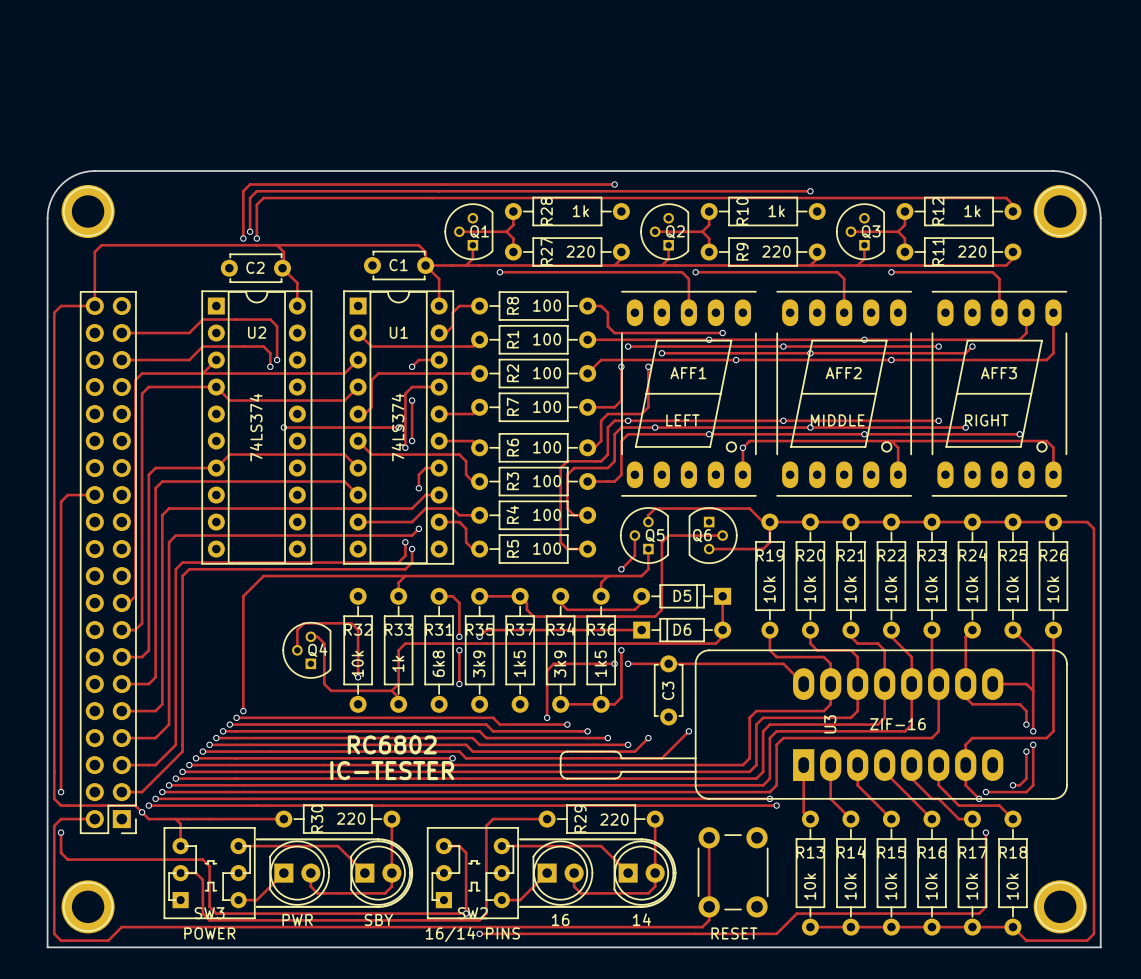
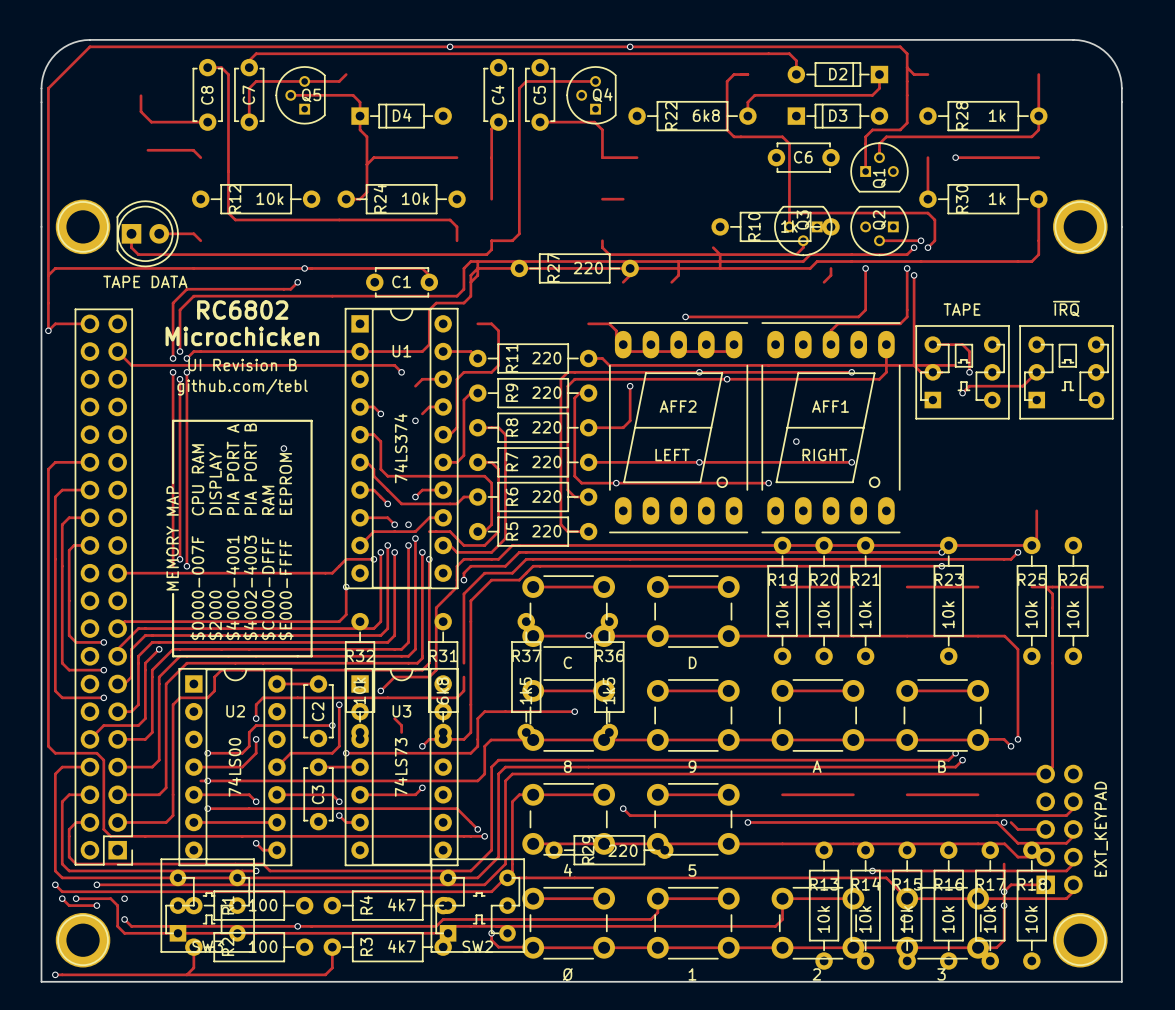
via: none -> (450, 46)
via: none -> (630, 46)
track: none -> (207, 67) (221, 67) (228, 74) (228, 213) (235, 219) (450, 219) (457, 226) (457, 240)
track: none -> (249, 67) (249, 60) (256, 53) (789, 53) (796, 60) (796, 74)
track: none -> (907, 67) (914, 74) (927, 74)
track: none -> (346, 74) (339, 81) (256, 81) (249, 88) (249, 122)
track: none -> (747, 74) (734, 74) (727, 81) (727, 129) (734, 136) (782, 136) (789, 143) (789, 226)
D2: none -> (837, 74)
track: none -> (879, 74) (879, 88) (872, 95) (754, 95) (747, 102) (747, 116)
track: none -> (1038, 74) (1038, 129) (1031, 136) (886, 136) (879, 143) (879, 157)
track: none -> (595, 81) (526, 81) (519, 88) (519, 226)
C8: none -> (207, 94)
C7: none -> (249, 94)
C4: none -> (498, 94)
C5: none -> (540, 94)
track: none -> (141, 95) (141, 111) (151, 122) (207, 122)
D4: none -> (401, 116)
D3: none -> (837, 116)
track: none -> (498, 122) (491, 129) (491, 199)
track: none -> (540, 122) (594, 122) (602, 129) (602, 157) (637, 157)
track: none -> (147, 150) (193, 150) (200, 157)
track: none -> (457, 157) (373, 157) (366, 164)
C6: none -> (803, 157)
track: none -> (927, 157) (927, 199)
track: none -> (955, 157) (1038, 157)
via: none -> (955, 157)
track: none -> (865, 171) (865, 136) (872, 129) (900, 129) (907, 123) (907, 53) (900, 46) (89, 46) (48, 88) (48, 330)
track: (344, 184) (250, 184) (243, 191) (243, 238) -> none
track: (358, 184) (594, 184) -> (360, 199) (366, 192) (366, 136) (360, 129) (360, 102) (353, 95) (290, 95)
via: (614, 184) -> none
track: none -> (1038, 199) (1038, 254) (1031, 261) (817, 261) (810, 268) (477, 268) (470, 275) (470, 296) (463, 303) (436, 303) (429, 310) (429, 344) (422, 351) (193, 351) (186, 358)
track: (810, 191) (256, 191) (250, 198) (250, 231) -> none
via: (810, 191) -> none
track: (776, 198) (263, 198) (256, 204) (256, 238) -> none
track: (911, 198) (1006, 198) (1012, 204) (1012, 211) -> (927, 213) (934, 219) (934, 240) (927, 247)
R28 position: (567, 211) -> (983, 116)
track: (709, 211) (709, 225) (702, 231) (655, 231) -> none
track: (904, 211) (904, 225) (898, 231) -> none
R12 position: (958, 211) -> (256, 199)
R12 value: 1k (972, 211) -> 10k (270, 198)
board edge: (47, 218) (52, 197) (61, 184) (74, 175) (94, 171) (1053, 171) (1069, 173) (1086, 184) (1096, 197) (1100, 218) -> (41, 233) (42, 77) (48, 62) (59, 50) (73, 42) (89, 39) (1084, 41) (1094, 44) (1107, 54) (1114, 62) (1120, 77) (1121, 233)
part: none -> (147, 233)
track: none -> (159, 233) (193, 233) (200, 240)
track: (513, 218) (513, 225) (506, 231) -> (519, 233) (512, 240) (491, 240) (491, 249) (486, 254) (138, 254) (131, 247) (131, 233)
track: none -> (602, 240) (602, 247) (609, 254) (796, 254) (803, 247) (803, 240)
track: none -> (879, 240) (921, 240)
via: none -> (921, 240)
via: (250, 231) -> none
track: (459, 231) (506, 231) -> none
Q1 rotation: 0° (468, 231) -> 90° clockwise (879, 167)
Q1 position: (468, 231) -> (879, 167)
track: (506, 231) (513, 238) (513, 252) -> none
Q2 rotation: 0° (664, 231) -> 90° counterclockwise (879, 230)
Q2 position: (664, 231) -> (879, 230)
track: (850, 231) (898, 231) -> (180, 351) (180, 310) (193, 296) (457, 296) (463, 289) (463, 268) (470, 261) (803, 261) (810, 254) (907, 254) (914, 247)
Q3 rotation: 0° (860, 231) -> 90° counterclockwise (803, 230)
Q3 position: (860, 231) -> (803, 230)
track: (898, 231) (904, 238) (904, 252) -> none
via: none -> (914, 247)
via: none -> (927, 247)
via: (243, 238) -> none
via: (256, 238) -> none
track: (277, 245) (283, 252) (282, 268) (297, 283) (297, 306) -> none
track: (864, 245) (864, 258) (857, 265) -> none
via: none -> (304, 268)
R9 position: (763, 252) -> (533, 393)
track: none -> (865, 268) (865, 310) (858, 316) (685, 316)
via: none -> (865, 268)
track: none -> (907, 268) (907, 316) (900, 323) (837, 323) (830, 330) (830, 344)
via: none -> (907, 268)
R11 position: (958, 252) -> (533, 358)
track: (1012, 252) (1012, 258) (1006, 265) (425, 265) (439, 279) (439, 306) -> none
track: (425, 258) (425, 252) (418, 245) (101, 245) (94, 252) (94, 306) -> (429, 275) (422, 268) (55, 268) (48, 275)
via: none -> (914, 275)
text: none -> TAPE DATA (145, 281)
track: none -> (297, 282) (290, 289) (186, 289) (173, 303) (173, 358)
via: none -> (297, 282)
C2 rotation: 0° (255, 268) -> 90° clockwise (318, 711)
C2 position: (255, 268) -> (318, 711)
track: (499, 272) (682, 272) (688, 279) (688, 312) -> none
via: (499, 272) -> none
track: (695, 272) (837, 272) (844, 279) (844, 312) -> none
via: (695, 272) -> none
track: (891, 272) (992, 272) (999, 279) (999, 312) -> none
via: (891, 272) -> none
U2 footprint: [201, 290, 313, 565] -> [178, 668, 293, 867]
text: none -> RC6802 (242, 310)
via: none -> (685, 316)
R8 value: 100 (547, 305) -> 220 (546, 427)
track: (472, 306) (459, 306) (452, 312) (452, 326) (445, 333) -> (477, 358) (470, 351) (450, 351)
R8 position: (533, 306) -> (533, 427)
track: none -> (588, 323) (595, 323)
track: (54, 312) (54, 447) -> (89, 462) (55, 462) (48, 469)
via: none -> (48, 330)
track: (1026, 312) (1026, 333) (1019, 339) (594, 339) -> (637, 365) (609, 365) (602, 358)
track: (1053, 312) (1053, 353) (1046, 360) (864, 360) -> (886, 344) (886, 372) (879, 379)
text: none -> Microchicken (242, 336)
track: none -> (932, 344) (962, 344) (969, 351) (969, 372)
U2 name position: U2 (257, 332) -> U2 (235, 711)
track: (121, 333) (189, 333) (202, 319) (270, 319) (277, 326) (277, 360) -> none
via: none -> (180, 351)
track: (358, 333) (371, 346) -> (263, 365) (373, 365)
via: (722, 333) -> none
via: none -> (173, 358)
via: none -> (186, 358)
track: (479, 339) (472, 346) (391, 346) -> (401, 372) (394, 365)
R1 position: (533, 339) -> (249, 905)
via: (709, 339) -> none
via: (864, 339) -> none
track: (202, 346) (189, 360) (121, 360) -> (200, 365) (131, 365) (117, 351)
text: none -> UI Revision B (242, 365)
track: (263, 346) (270, 353) (270, 366) -> none
via: (628, 346) -> none
via: (783, 346) -> none
via: (938, 346) -> none
track: (972, 346) (965, 353) (925, 353) -> none
via: (972, 346) -> none
track: none -> (173, 372) (173, 566)
via: none -> (173, 372)
track: none -> (186, 372) (186, 566)
via: none -> (186, 372)
track: none -> (671, 372) (567, 372) (560, 379) (560, 524) (567, 531) (588, 531)
via: (661, 353) -> none
via: none -> (699, 372)
via: (810, 353) -> none
track: (837, 353) (904, 353) -> (914, 275) (914, 365) (921, 372)
via: none -> (851, 372)
part: none -> TAPE (962, 372)
via: none -> (969, 372)
track: none -> (1036, 372) (1022, 386) (969, 386) (962, 393)
part: none -> ~{IRQ} (1066, 372)
track: none -> (180, 379) (180, 559)
via: none -> (180, 379)
track: (216, 360) (202, 373) -> none
via: (277, 360) -> none
track: (358, 360) (344, 373) (142, 373) (135, 380) (135, 596) (128, 603) (121, 603) -> (346, 587) (346, 614) (339, 621) (124, 621) (117, 628)
track: (601, 360) (587, 373) -> (609, 379) (574, 379) (567, 386) (567, 490) (574, 496) (588, 496)
via: none -> (727, 379)
via: (736, 360) -> none
via: (891, 360) -> none
via: (270, 366) -> none
via position: (412, 366) -> (401, 372)
track: (648, 366) (648, 407) (641, 414) (607, 414) (601, 420) (601, 441) (594, 447) (587, 447) -> none
via: (648, 366) -> none
text: none -> github.com/tebl (242, 387)
track: (466, 373) (378, 373) (371, 380) (371, 407) (364, 414) -> none
R2 position: (533, 373) -> (249, 947)
via: none -> (962, 393)
track: (358, 387) (344, 400) (229, 400) (216, 387) (148, 387) (142, 393) (142, 623) (135, 630) (121, 630) -> (380, 552) (380, 621) (373, 628) (138, 628) (117, 649) (117, 656)
track: (425, 387) (412, 387) (405, 393) (405, 447) -> (429, 406) (422, 413)
via: none -> (380, 413)
AFF1 position: (688, 393) -> (830, 427)
AFF2 position: (844, 393) -> (678, 427)
AFF3: RIGHT (999, 393) -> none
track: (412, 400) (412, 441) -> none
R7 value: 100 (547, 406) -> 220 (546, 461)
track: (479, 407) (472, 414) (445, 414) -> (484, 323) (491, 323) (498, 330) (498, 365) (491, 372) (463, 372) (457, 379) (457, 427) (450, 434)
R7 position: (533, 407) -> (533, 462)
via: (628, 420) -> none
AFF1 value: LEFT (682, 420) -> RIGHT (824, 455)
AFF2 value: MIDDLE (837, 420) -> LEFT (672, 455)
track: (938, 420) (614, 420) (607, 427) (607, 454) (601, 461) -> (768, 483) (609, 483)
via: (938, 420) -> none
U2 value: 74LS374 (256, 427) -> 74LS00 (234, 767)
track: (283, 427) (398, 427) -> none
via: (398, 427) -> none
via: (655, 427) -> none
via: (810, 427) -> none
track: (965, 427) (621, 427) (614, 434) (614, 461) (607, 468) (574, 468) (567, 474) (567, 508) (574, 515) (587, 515) -> none
via: (965, 427) -> none
via: (709, 434) -> none
via: (864, 434) -> none
track: (1019, 434) (628, 434) (621, 441) (621, 474) (614, 481) (587, 481) -> none
via: (1019, 434) -> none
track: (358, 441) (371, 454) (385, 454) -> (366, 434) (373, 434) (380, 441) (380, 469) (387, 476)
track: none -> (360, 462) (366, 462) (373, 469) (373, 476) (401, 503) (457, 503) (463, 496) (477, 496)
via: (412, 441) -> none
track: (452, 441) (472, 441) (479, 447) -> (457, 462) (463, 455) (463, 400) (470, 393)
via: none -> (699, 462)
track: (749, 441) (742, 447) (742, 474) -> (761, 462) (588, 462)
track: (837, 441) (1046, 441) (1053, 447) (1053, 474) -> none
via: none -> (851, 462)
track: (891, 441) (898, 447) (898, 474) -> none
text: none -> PIA PORT A (233, 469)
text: none -> PIA PORT B (250, 469)
via: (405, 447) -> none
R6 position: (533, 447) -> (533, 496)
R6 value: 100 (547, 447) -> 220 (546, 496)
via position: (742, 447) -> (768, 483)
track: (459, 454) (466, 461) (466, 474) (472, 481) (479, 481) -> (463, 476) (484, 476) (491, 483) (491, 524) (484, 531) (477, 531)
text: none -> CPU RAM (198, 479)
line: none -> (173, 483) (173, 420) (311, 420) (311, 656) (173, 656) (173, 593)
text: none -> DISPLAY (215, 483)
track: (574, 461) (567, 461) (560, 468) (560, 542) (567, 549) (587, 549) -> (581, 483) (574, 476) (574, 398) (579, 393) (588, 393)
via: none -> (616, 483)
text: none -> EEPROM (285, 483)
track: (358, 468) (344, 454) (229, 454) (216, 468) (155, 468) (148, 474) (148, 636) -> (159, 649) (145, 663)
track: none -> (360, 490) (373, 490) (387, 503)
track: (425, 468) (418, 474) (418, 488) -> (429, 490) (422, 490) (415, 496)
via: none -> (415, 496)
text: none -> RAM (268, 500)
via: none -> (387, 503)
R3 position: (533, 481) -> (387, 947)
R3 value: 100 (547, 481) -> 4k7 (401, 946)
via: (418, 488) -> none
track: (74, 495) (67, 495) (61, 501) -> (89, 490) (62, 490) (55, 496) (55, 524)
track: none -> (69, 517) (62, 524) (62, 663) (69, 670) (103, 670)
track: (358, 495) (344, 481) (162, 481) (155, 488) (155, 643) -> (304, 649) (173, 649) (152, 670)
track: none -> (360, 517) (387, 517) (394, 524)
via: none -> (394, 524)
via: none -> (408, 524)
track: (371, 508) (169, 508) (162, 515) (162, 650) -> (415, 587) (415, 649) (408, 656) (180, 656) (159, 677)
track: (425, 508) (412, 522) (358, 522) -> (373, 531) (360, 545)
track: (445, 508) (452, 508) (459, 515) (479, 515) -> (450, 531) (463, 545) (484, 545) (498, 531) (498, 469) (491, 462) (477, 462)
R4 value: 100 (547, 514) -> 4k7 (401, 904)
text: none -> MEMORY MAP (172, 538)
track: none -> (415, 538) (415, 573)
via: none -> (415, 538)
R4 position: (533, 515) -> (387, 905)
track: none -> (89, 545) (74, 545) (69, 550) (69, 635) (76, 642) (103, 642)
track: none -> (387, 545) (387, 628) (380, 635) (145, 635) (131, 649) (131, 677) (124, 683)
via: none -> (387, 545)
track: none -> (408, 545) (408, 566)
via: none -> (408, 545)
track: (445, 522) (459, 522) (466, 528) (466, 542) (472, 549) (479, 549) -> (450, 545) (457, 552) (491, 552) (505, 538) (505, 434) (498, 427) (477, 427)
track: (648, 522) (648, 515) (655, 508) (749, 508) (763, 522) -> (380, 690) (394, 677) (429, 677) (436, 670) (436, 607) (457, 587) (457, 566) (463, 559) (498, 559) (512, 545) (775, 545)
track: (769, 522) (769, 542) (763, 549) (709, 549) -> none
track: (1012, 522) (1087, 522) (1093, 528) (1093, 933) (1087, 940) (1026, 940) (1012, 927) (810, 927) -> (1031, 545) (1036, 540) (1036, 510)
via: none -> (380, 552)
via: none -> (394, 552)
track: (418, 528) (412, 535) (371, 535) -> (422, 552) (422, 658) (417, 663) (318, 663)
track: none -> (941, 552) (519, 552) (505, 566) (470, 566) (463, 573) (463, 580)
via: none -> (941, 552)
track: none -> (1017, 552) (1011, 559) (734, 559)
via: none -> (1017, 552)
via: none -> (180, 559)
track: (344, 535) (175, 535) (169, 542) (169, 657) -> (311, 663) (186, 663) (166, 683)
track: none -> (346, 559) (332, 573) (117, 573)
via: none -> (373, 559)
via: none -> (429, 559)
track: (634, 535) (634, 555) (621, 569) -> none
Q5 position: (644, 535) -> (300, 95)
track: (668, 535) (661, 542) (661, 609) (655, 616) (533, 616) (526, 609) (526, 603) (520, 596) (479, 596) -> (678, 559) (526, 559) (512, 573) (484, 573) (463, 593) (463, 628)
Q6: (713, 535) -> none
via: none -> (186, 566)
via: (405, 542) -> none
track: none -> (941, 566) (533, 566) (519, 580) (491, 580) (470, 600) (470, 732) (463, 739) (429, 739) (422, 746)
via: none -> (941, 566)
R5 value: 100 (547, 548) -> 220 (546, 531)
via: (412, 549) -> none
R5 position: (533, 549) -> (533, 531)
track: (648, 549) (648, 569) (641, 576) (263, 576) (243, 596) (243, 711) -> none
track: (405, 555) (398, 562) (182, 562) (175, 569) (175, 677) -> (408, 670) (221, 670) (214, 677) (214, 690) (207, 697) (180, 697) (173, 704)
via: none -> (463, 580)
R22 name position: R22 (891, 555) -> R22 (671, 115)
R24 name position: R24 (972, 555) -> R24 (380, 198)
via: none -> (346, 587)
track: (412, 562) (405, 569) (189, 569) (182, 576) (182, 751) (142, 792) -> (159, 822) (138, 822)
track: none -> (533, 587) (604, 587)
track: none -> (657, 587) (728, 587)
track: none -> (782, 587) (853, 587)
track: none -> (907, 587) (978, 587)
track: none -> (1031, 587) (1102, 587)
text: none -> $0000-007F (198, 588)
text: none -> $4000-4001 (233, 587)
text: none -> $4002-4003 (250, 587)
text: none -> $C000-DFFF (268, 588)
text: none -> $E000-FFFF (285, 589)
via: (621, 569) -> none
track: (405, 576) (398, 582) (398, 596) -> none
track: (607, 576) (601, 582) (601, 596) -> none
R22 rotation: 0° (891, 576) -> 90° clockwise (692, 116)
R22 position: (891, 576) -> (692, 116)
R24 rotation: 0° (972, 576) -> 90° clockwise (401, 199)
R24 position: (972, 576) -> (401, 199)
part: none -> C (568, 611)
part: none -> D (693, 611)
R22 value: 10k (891, 589) -> 6k8 (706, 115)
text: none -> $2000 (215, 615)
track: (439, 596) (452, 596) (459, 603) -> (360, 406) (373, 406) (380, 413)
track: (560, 596) (560, 603) (567, 609) (634, 609) (641, 603) (641, 596) -> none
D5: (682, 596) -> none
track: (722, 596) (722, 636) (715, 643) (418, 643) -> (429, 559) (429, 663) (422, 670)
via: none -> (588, 635)
track: none -> (533, 636) (1004, 636) (1017, 649) (1017, 739)
via: none -> (103, 642)
via: none -> (159, 649)
track: (304, 623) (297, 630) (297, 650) -> none
track: (351, 623) (358, 630) (358, 677) -> (353, 649) (401, 649) (408, 642) (408, 580)
track: (641, 630) (486, 630) (479, 636) -> none
D6: (682, 630) -> none
track: (769, 630) (769, 650) (776, 657) (823, 657) (830, 663) (830, 704) (823, 711) (756, 711) (749, 717) (749, 758) (742, 765) (717, 765) -> none
track: (810, 630) (810, 643) (817, 650) (850, 650) (857, 657) (857, 711) (850, 717) (763, 717) (756, 724) (756, 765) (749, 771) (182, 771) -> none
track: (850, 630) (850, 636) (857, 643) (877, 643) (884, 650) (884, 717) (877, 724) (769, 724) (763, 731) (763, 771) (756, 778) (452, 778) -> (477, 829) (457, 808)
track: (891, 630) (891, 636) (911, 657) (911, 724) (904, 731) -> (955, 753) (948, 760) (921, 760)
track: (931, 630) (931, 677) (938, 684) (938, 731) (931, 738) -> (962, 760) (955, 767) (948, 767)
track: (972, 630) (965, 636) (965, 697) (972, 704) (1019, 704) (1026, 711) (1026, 724) -> none
track: (1012, 630) (1033, 650) -> (1045, 587) (1052, 593) (1052, 677)
track: (1053, 630) (1053, 731) (1046, 738) (972, 738) (965, 744) (965, 785) (979, 798) -> none
track: (317, 636) (324, 643) (324, 684) (331, 690) (391, 690) (398, 684) (398, 650) (405, 643) -> none
via: (459, 636) -> none
via: (479, 636) -> none
via: none -> (103, 670)
U3 footprint: [559, 649, 1068, 800] -> [344, 668, 459, 867]
track: (148, 650) (142, 657) (128, 657) -> (145, 677) (145, 718) (138, 725) (103, 725) (89, 739)
Q4 position: (306, 650) -> (591, 95)
R33: 1k (398, 650) -> none
via: (459, 650) -> none
R35: 3k9 (479, 650) -> none
R34: 3k9 (560, 650) -> none
track: (621, 650) (621, 697) (614, 704) (560, 704) -> none
via: (621, 650) -> none
track: none -> (276, 683) (318, 683)
track: (61, 663) (61, 744) -> (89, 767) (62, 767) (55, 774)
track: none -> (55, 690) (62, 697) (103, 697)
via: none -> (380, 690)
track: (459, 663) (459, 684) -> (463, 690) (457, 697) (263, 697) (256, 704) (256, 718)
track: (553, 663) (547, 670) (547, 717) -> (560, 690) (533, 690)
track: (595, 663) (614, 663) -> none
via: (614, 663) -> none
track: (628, 663) (648, 663) -> none
via: (628, 663) -> none
track: (717, 663) (769, 663) -> none
track: (783, 663) (803, 684) -> (796, 690) (853, 690)
track: none -> (907, 690) (978, 690)
via: none -> (103, 697)
track: (155, 677) (148, 684) (135, 684) -> (394, 552) (394, 635) (387, 642) (152, 642) (138, 656) (138, 704) (131, 711)
via: none -> (339, 704)
via: (358, 677) -> none
via: (459, 684) -> none
via: none -> (574, 711)
track: (992, 684) (1026, 684) (1033, 690) -> none
part: none -> 8 (568, 715)
part: none -> 9 (693, 715)
part: none -> A (817, 715)
part: none -> B (942, 715)
via: none -> (256, 718)
C3 position: (668, 690) -> (318, 794)
track: none -> (332, 725) (256, 725) (249, 732) (249, 746) (242, 753)
via: none -> (332, 725)
track: (162, 704) (155, 711) (148, 711) -> (152, 704) (152, 732) (145, 739)
via: (243, 711) -> none
via: none -> (256, 739)
via: none -> (1017, 739)
track: (54, 717) (54, 798) (61, 805) (115, 805) -> (48, 746) (55, 753) (96, 753) (103, 760) (103, 829) (110, 836)
track: (236, 717) (493, 717) (499, 724) (567, 724) -> none
via: (236, 717) -> none
via: none -> (422, 746)
via: (547, 717) -> none
via: none -> (1011, 746)
track: (169, 724) (162, 731) -> (159, 732) (159, 760)
track: none -> (207, 753) (228, 753)
via: none -> (207, 753)
via: (229, 724) -> none
track: (243, 724) (290, 724) -> (276, 767) (290, 753)
track: (331, 724) (344, 724) -> (332, 753) (339, 746) (339, 704)
via: none -> (346, 753)
track: (466, 724) (486, 724) (493, 731) -> (470, 753) (477, 746) (477, 718) (484, 711) (574, 711)
via: (567, 724) -> none
U3 name position: U3 (830, 724) -> U3 (401, 711)
U3 value: ZIF-16 (897, 724) -> 74LS73 (400, 767)
via: none -> (955, 753)
via: (1026, 724) -> none
track: (223, 731) (479, 731) (486, 738) (499, 738) -> (463, 877) (477, 877) (498, 857) (498, 774) (505, 767)
via: (223, 731) -> none
track: none -> (498, 760) (491, 767) (491, 850) (470, 870) (270, 870) (263, 864) (76, 864) (69, 857) (69, 829) (76, 822) (89, 822)
via: (587, 731) -> none
track: (688, 731) (661, 758) (466, 758) (459, 751) -> (1011, 746) (1004, 739) (491, 739) (484, 746) (484, 774) (477, 780) (463, 780)
via: (688, 731) -> none
track: (776, 731) (769, 738) (769, 778) (763, 785) -> (789, 760) (595, 760)
via: none -> (962, 760)
track: none -> (1052, 760) (1052, 767) (1045, 774) (637, 774)
via: (1033, 731) -> none
track: none -> (193, 767) (214, 767)
via: (216, 738) -> none
track: (243, 738) (317, 738) -> (242, 767) (256, 753) (256, 739)
track: (358, 738) (472, 738) (479, 744) (506, 744) -> (96, 884) (484, 884) (505, 864) (505, 780) (512, 774)
via: (607, 738) -> none
track: (648, 738) (634, 751) (472, 751) (466, 744) (209, 744) -> none
via: (648, 738) -> none
track: (783, 738) (776, 744) (776, 785) (769, 792) -> (796, 767) (616, 767)
track: (175, 744) (155, 765) -> (166, 753) (166, 787) (159, 794) (152, 794)
via: (209, 744) -> none
text: RC6802 (392, 744) -> none
via: (628, 744) -> none
track: (1033, 744) (1033, 785) (1026, 792) (985, 792) -> none
via: (1033, 744) -> none
via: (202, 751) -> none
via: none -> (207, 780)
track: (1026, 751) (1026, 778) (1019, 785) -> (1073, 801) (1073, 808) (1066, 815) (1038, 815)
via: (1026, 751) -> none
track: (196, 758) (452, 758) -> none
via: (196, 758) -> none
via: none -> (422, 787)
via: (452, 758) -> none
track: none -> (89, 794) (69, 794) (62, 801) (62, 864) (69, 870) (256, 870)
via: (189, 765) -> none
track: (250, 765) (277, 765) -> (249, 794) (256, 801)
track: (331, 765) (358, 765) -> (332, 794) (339, 801)
track: (412, 765) (513, 765) -> (415, 794) (422, 787)
track: (595, 765) (648, 765) -> none
track: none -> (782, 794) (853, 794)
track: (803, 765) (803, 812) (810, 819) -> none
track: (830, 765) (830, 798) (850, 819) -> none
track: (857, 765) (857, 785) (891, 819) -> none
track: (884, 765) (884, 771) (931, 819) -> none
track: none -> (907, 794) (978, 794)
track: (911, 765) (911, 778) (931, 798) (938, 798) (958, 819) (972, 819) -> none
track: (938, 765) (938, 785) (958, 805) (999, 805) (1012, 819) -> none
text: IC-TESTER (392, 770) -> none
via: (182, 771) -> none
via: none -> (256, 801)
via: none -> (339, 801)
track: (175, 778) (209, 778) -> none
via: (175, 778) -> none
via: none -> (207, 808)
via: none -> (623, 808)
track: (169, 785) (621, 785) -> (623, 808) (630, 815)
via: (169, 785) -> none
via: none -> (339, 815)
track: none -> (775, 815) (1031, 815)
via: (1012, 785) -> none
part: none -> 4 (568, 819)
part: none -> 5 (693, 819)
track: none -> (55, 822) (55, 864)
via: (61, 792) -> none
via: (162, 792) -> none
track: (169, 792) (196, 792) -> (166, 822) (173, 815) (173, 774)
track: (277, 792) (344, 792) -> (339, 815) (346, 822)
track: (358, 792) (736, 792) -> none
via: none -> (747, 822)
track: none -> (782, 822) (997, 822) (1017, 843) (1066, 843) (1073, 836) (1073, 829)
track: none -> (1011, 822) (1017, 829) (1045, 829)
track: (155, 798) (769, 798) -> none
via: (155, 798) -> none
via: none -> (477, 829)
via: (769, 798) -> none
via: (979, 798) -> none
part: none -> EXT_KEYPAD (1059, 829)
track: (135, 805) (148, 819) (263, 819) -> (131, 836) (145, 836)
via: (148, 805) -> none
track: (479, 805) (776, 805) -> none
via: none -> (484, 836)
via: (776, 805) -> none
via: (142, 812) -> none
track: none -> (256, 843) (263, 850)
via: none -> (256, 843)
track: none -> (533, 843) (1004, 843) (1017, 857) (1045, 857)
R30 value: 220 (351, 818) -> 1k (997, 198)
track: (94, 819) (61, 819) (54, 825) (54, 933) (61, 940) -> none
track: (175, 819) (180, 823) (180, 846) -> none
R30 position: (337, 819) -> (983, 199)
track: (391, 819) (391, 886) (385, 893) -> (728, 898) (657, 898) (657, 912) (650, 919) (443, 919) (436, 926) (387, 926)
track: (547, 819) (493, 819) (486, 825) (486, 900) -> none
track: (655, 819) (655, 886) (648, 893) -> (853, 898) (782, 898) (782, 919) (775, 926) (657, 926)
track: none -> (1073, 857) (1073, 864) (1066, 870) (872, 870)
via: (61, 832) -> none
via: (985, 832) -> none
track: (709, 837) (709, 920) (702, 927) (121, 927) (108, 940) -> (332, 947) (332, 967) (325, 974) (103, 974)
track: (61, 839) (61, 852) -> (55, 870) (62, 877) (237, 877)
line: (256, 839) (387, 840) (395, 843) (405, 852) (409, 860) (412, 873) (410, 881) (405, 893) (395, 902) (387, 905) (256, 906) -> none
via: none -> (256, 870)
line: (520, 839) (641, 839) (658, 843) (665, 849) (672, 860) (675, 873) (674, 881) (670, 889) (662, 899) (654, 904) (641, 906) -> none
via: none -> (872, 870)
track: (337, 846) (364, 873) -> (339, 877) (448, 877)
track: (459, 846) (466, 852) (466, 913) (216, 913) (209, 906) (209, 866) (202, 859) -> (519, 794) (512, 801) (512, 870) (491, 891) (200, 891)
track: (601, 846) (628, 873) -> (609, 877) (886, 877) (907, 898) (1066, 898) (1073, 891) (1073, 884)
via: none -> (55, 884)
via: none -> (96, 884)
track: none -> (1045, 884) (1011, 884) (1004, 891)
via: none -> (1004, 891)
track: none -> (62, 898) (69, 905) (96, 905)
via: none -> (62, 898)
track: none -> (76, 898) (110, 898) (117, 905) (117, 926) (124, 933) (237, 933)
via: none -> (76, 898)
via: none -> (124, 898)
track: none -> (533, 898) (604, 898)
part: (733, 872) -> none
via: none -> (96, 905)
track: (180, 873) (196, 873) (202, 879) (202, 913) (209, 920) (479, 920) (486, 913) (486, 906) -> none
track: (283, 873) (256, 900) -> (588, 926) (450, 926) (443, 933) (256, 933)
part: PWR (299, 873) -> none
track: (310, 873) (310, 886) (317, 893) -> (124, 919) (131, 926) (318, 926)
part: SBY (380, 873) -> none
track: (547, 873) (520, 900) (501, 900) -> none
part: 16 (562, 873) -> none
track: (574, 873) (574, 886) (580, 893) -> none
part: 14 (643, 873) -> none
via: none -> (1004, 905)
via: none -> (124, 919)
part: none -> Ø (568, 923)
part: none -> 1 (693, 923)
part: none -> 2 (817, 923)
part: none -> 3 (942, 923)
via: none -> (297, 926)
via: none -> (491, 933)
line: (520, 906) (641, 906) -> none
track: none -> (193, 947) (193, 967) (186, 974)
via: (466, 913) -> none
track: (979, 913) (796, 913) (776, 933) (479, 933) -> (997, 947) (533, 947) (498, 947) (491, 940)
text: POWER (209, 933) -> none
via: (479, 933) -> none
text: RESET (734, 933) -> none
text: 16/14 PINS (472, 934) -> none
via: none -> (55, 974)

